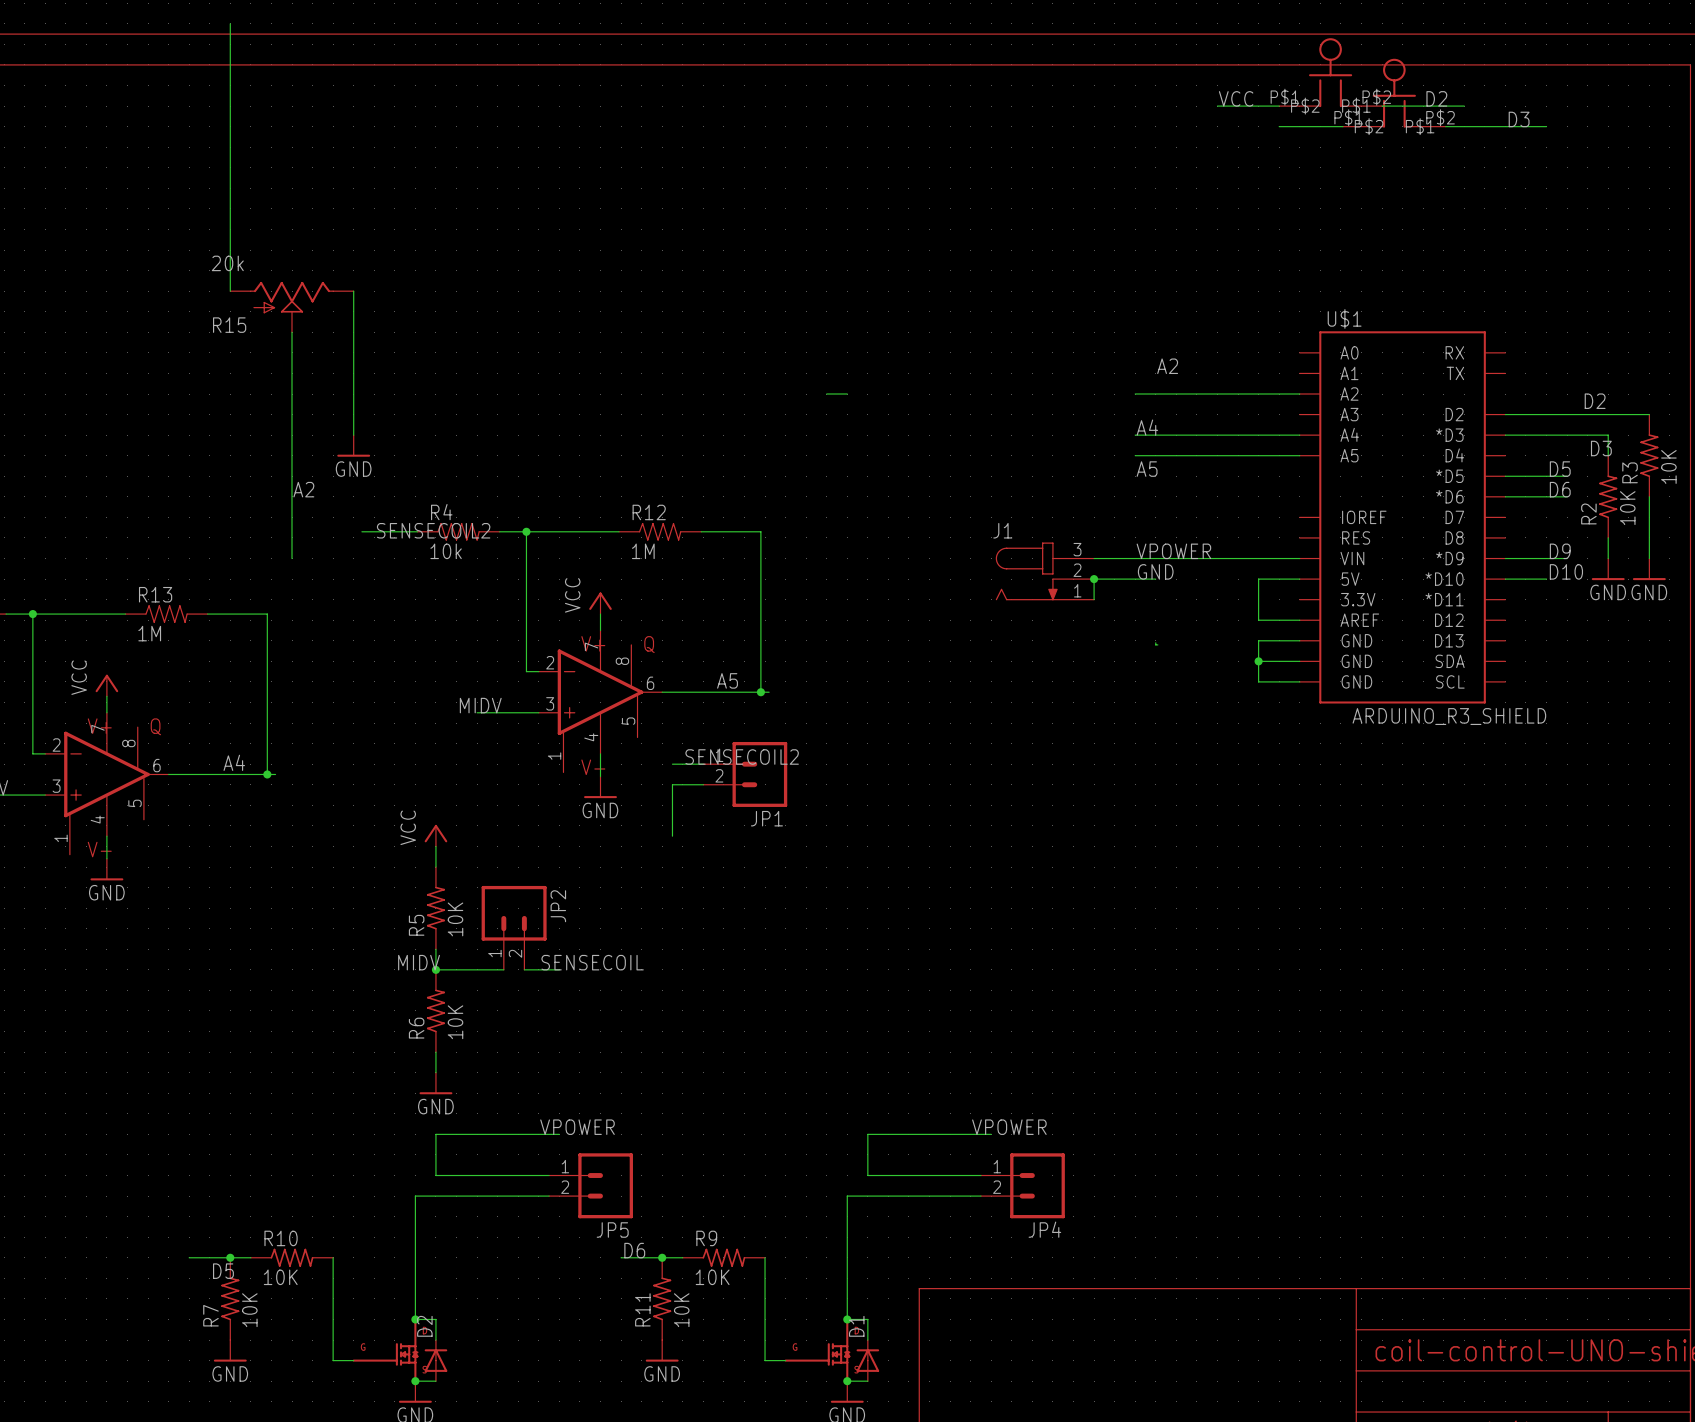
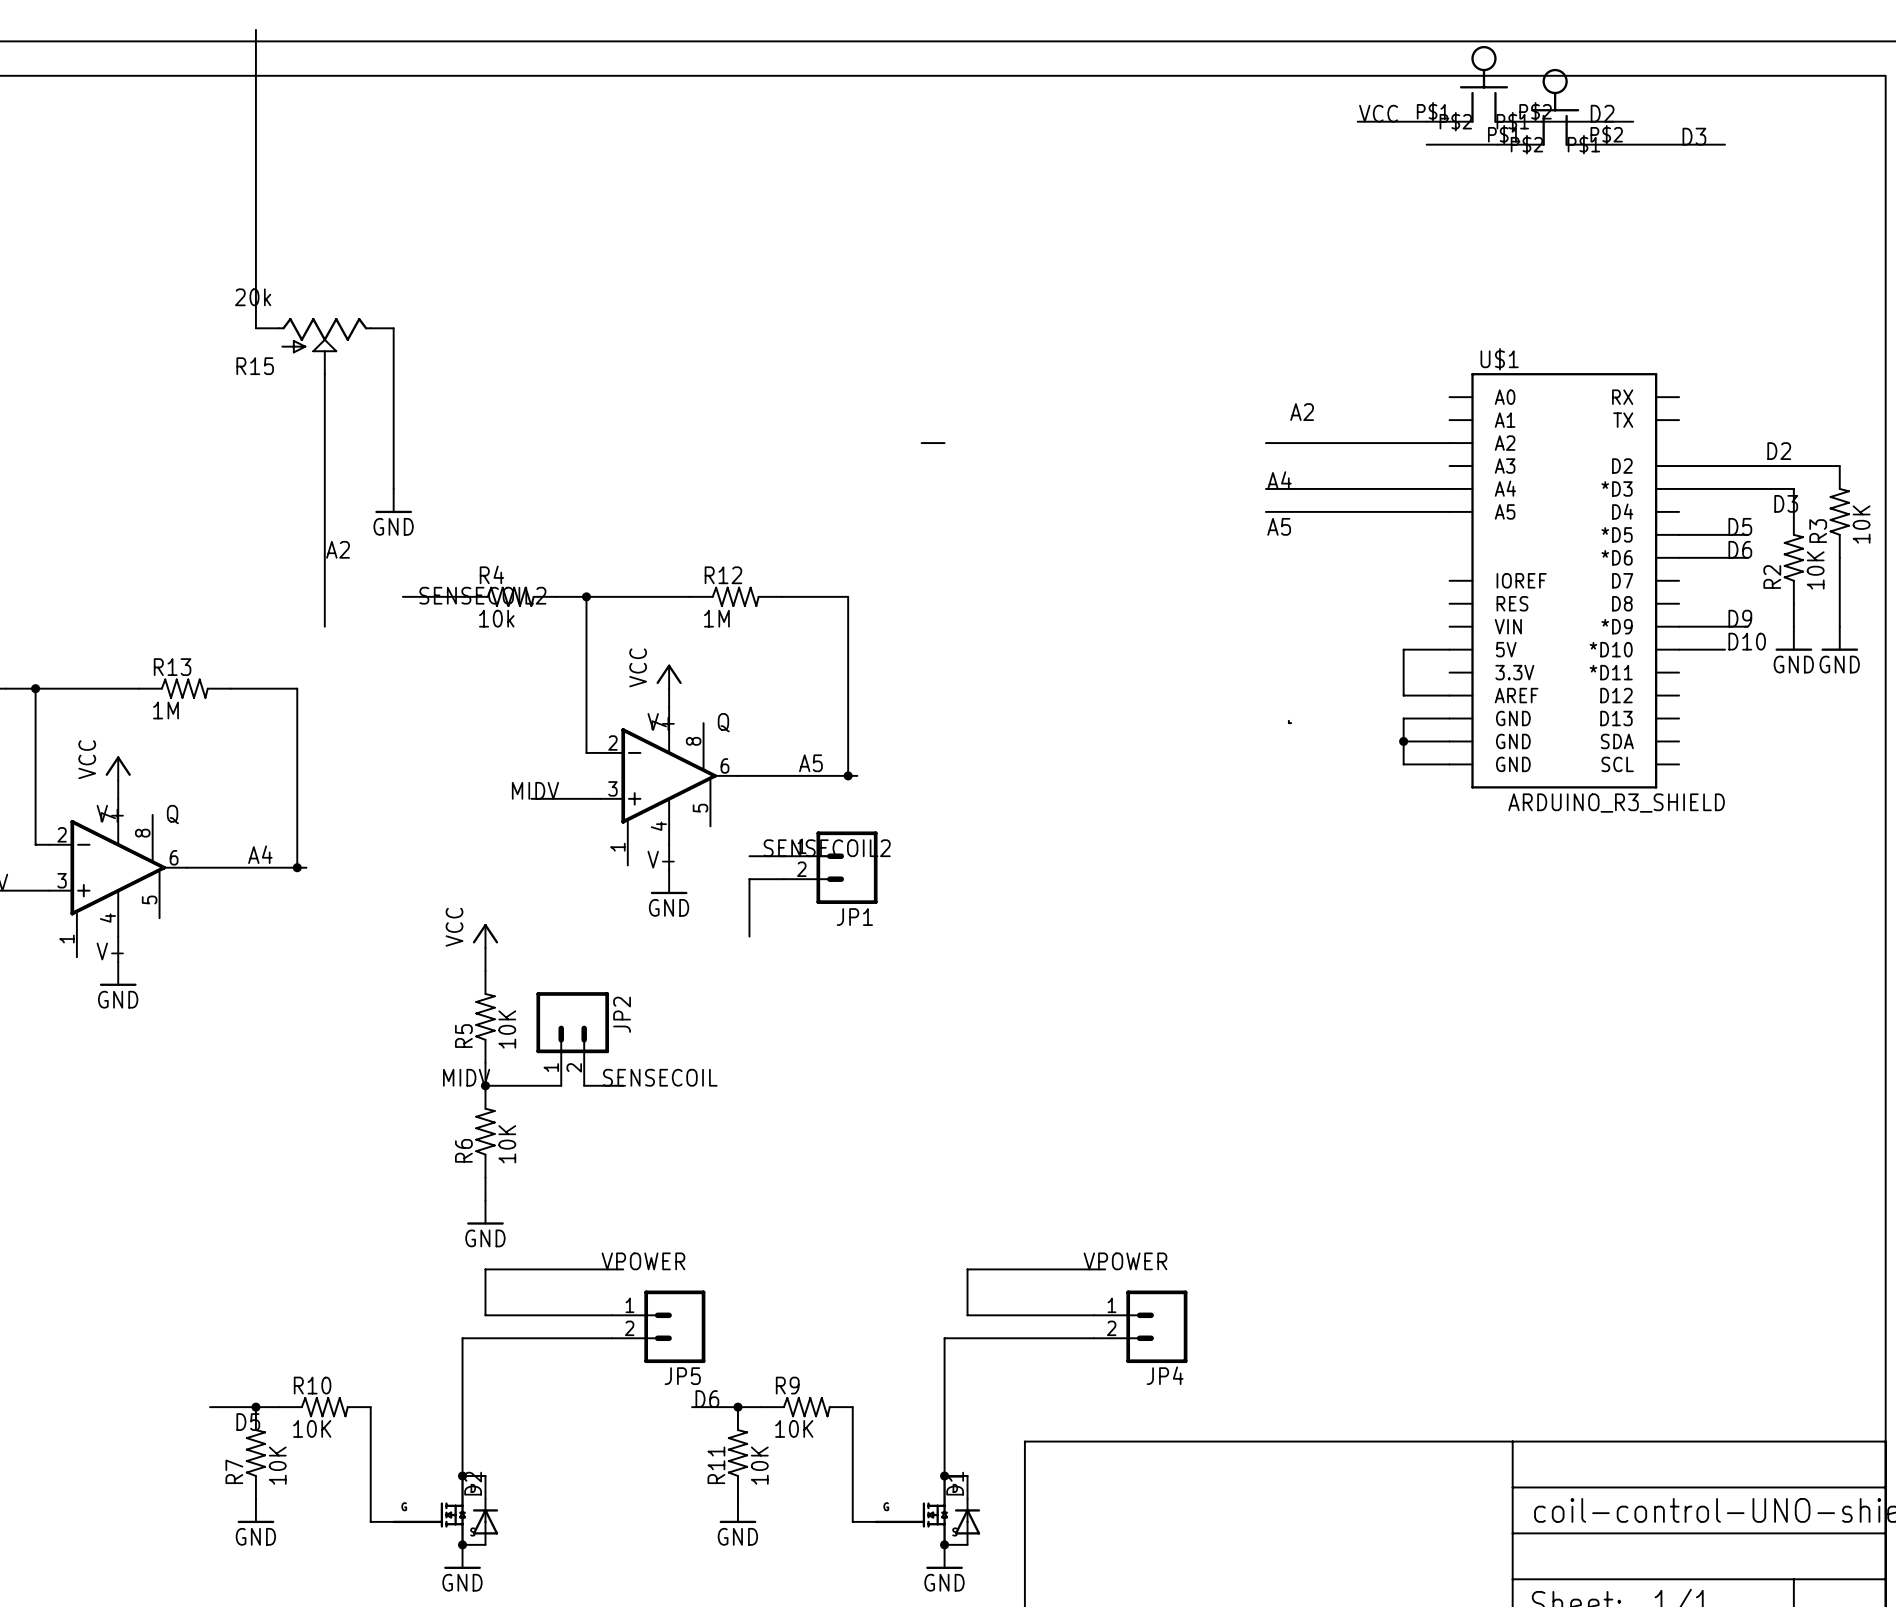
label: VPOWER (1173, 551) -> none
wire: (1094, 558) (1299, 558) -> none
J1: (1044, 571) -> none
label: GND (1155, 571) -> none
junction: (1094, 579) -> none
wire: (1155, 579) (1094, 579) (1094, 599) -> none

